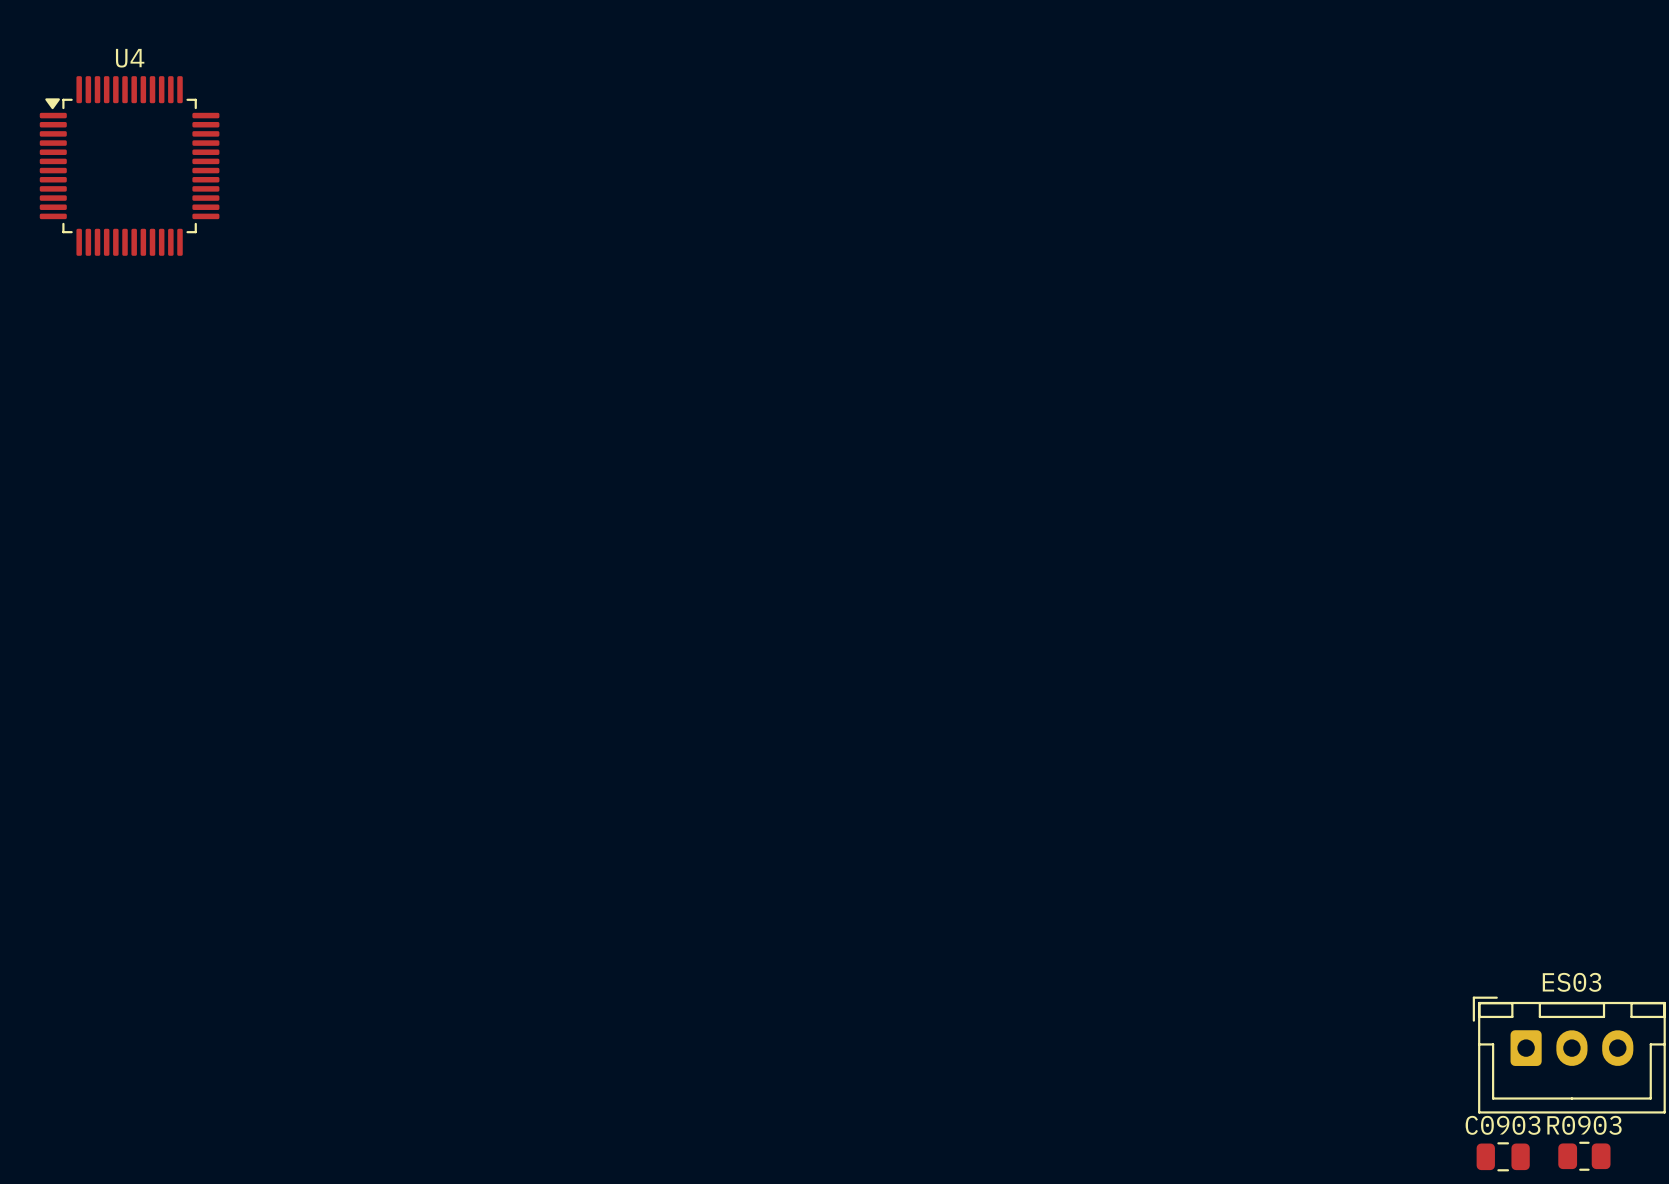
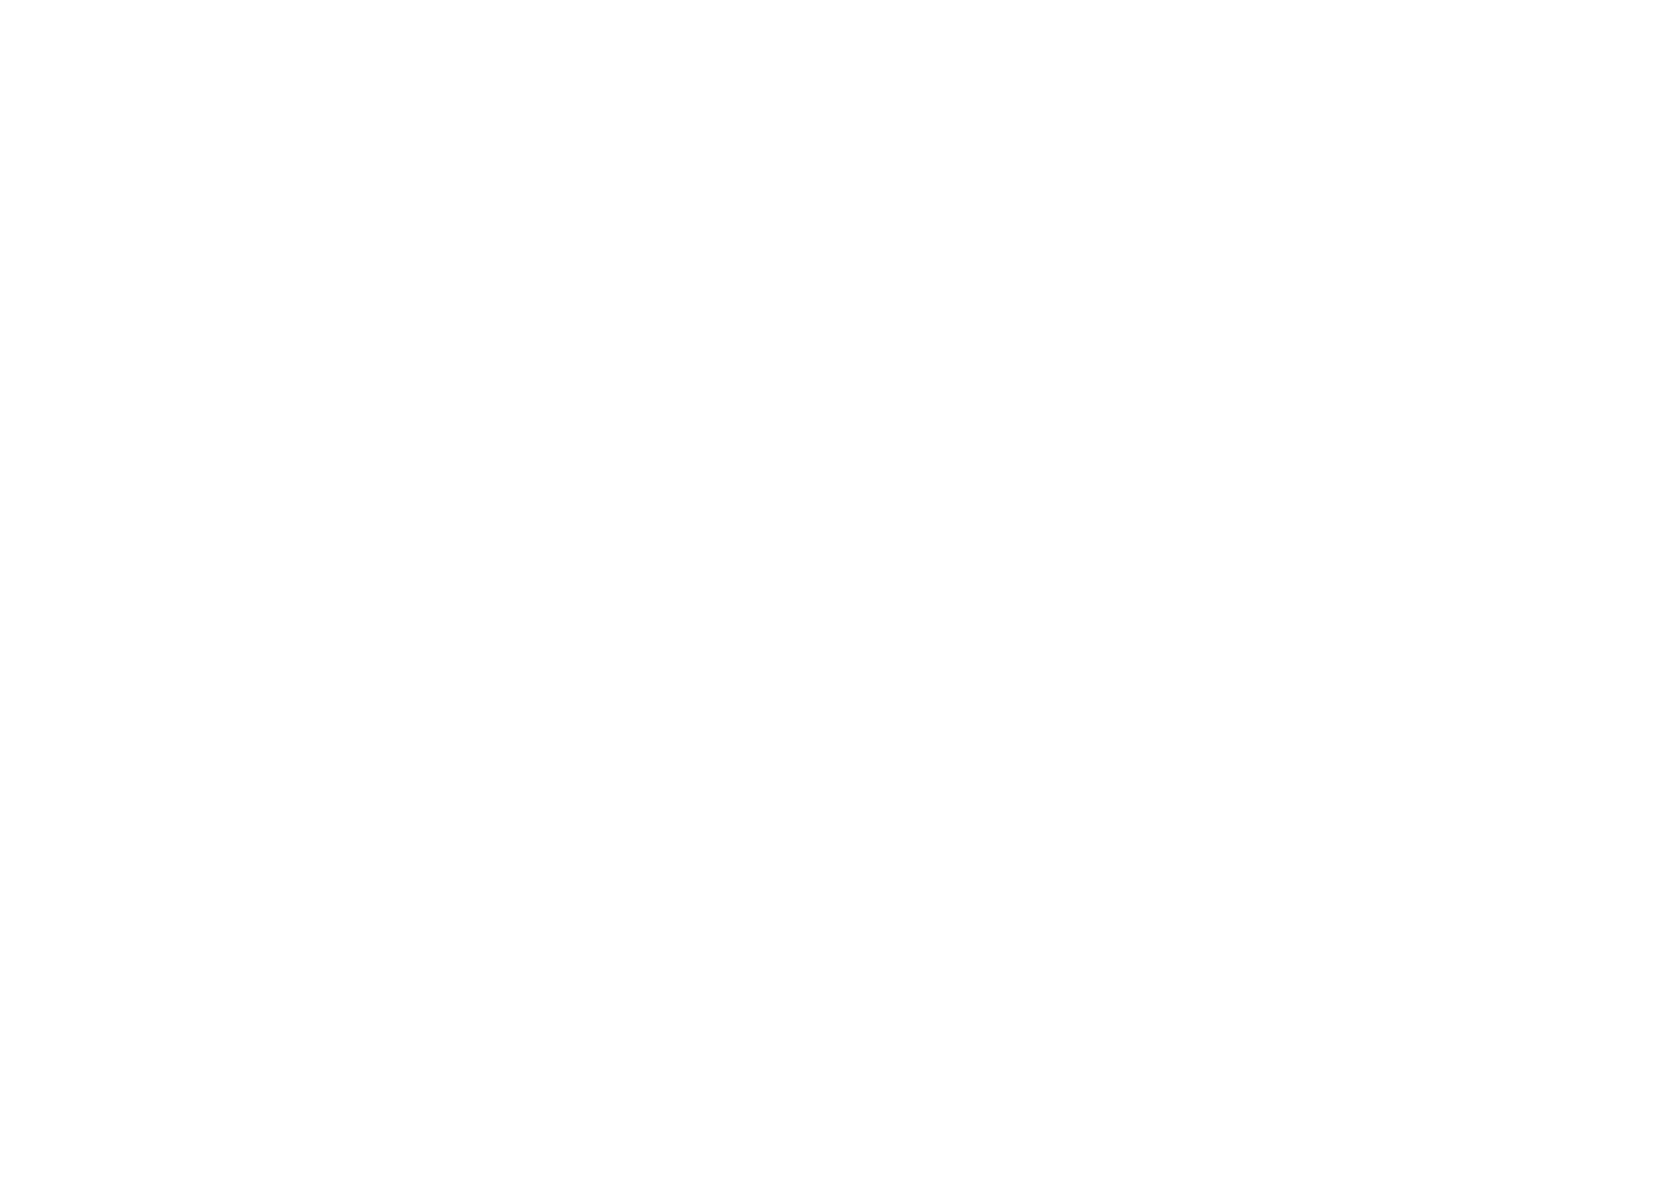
U4: (129, 165) -> none
ES03: (1569, 1055) -> none
C0903: (1503, 1156) -> none
R0903: (1584, 1156) -> none

